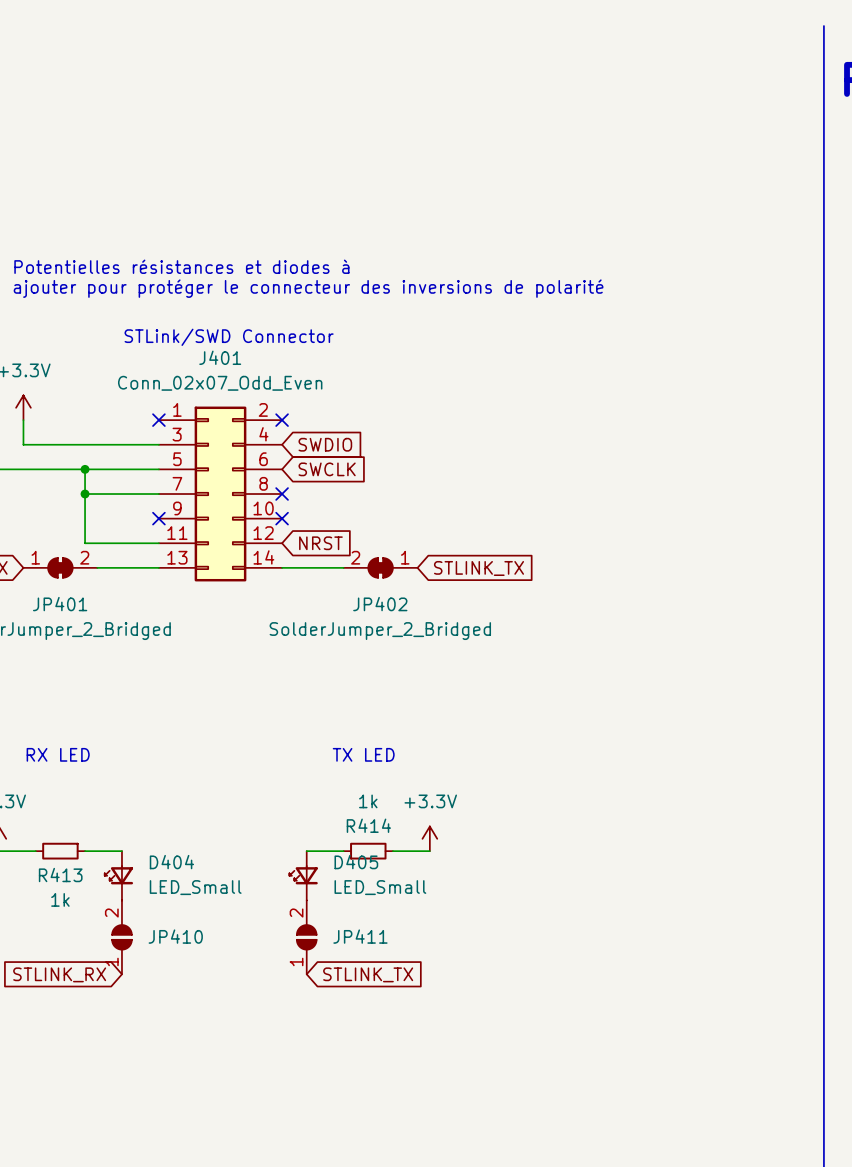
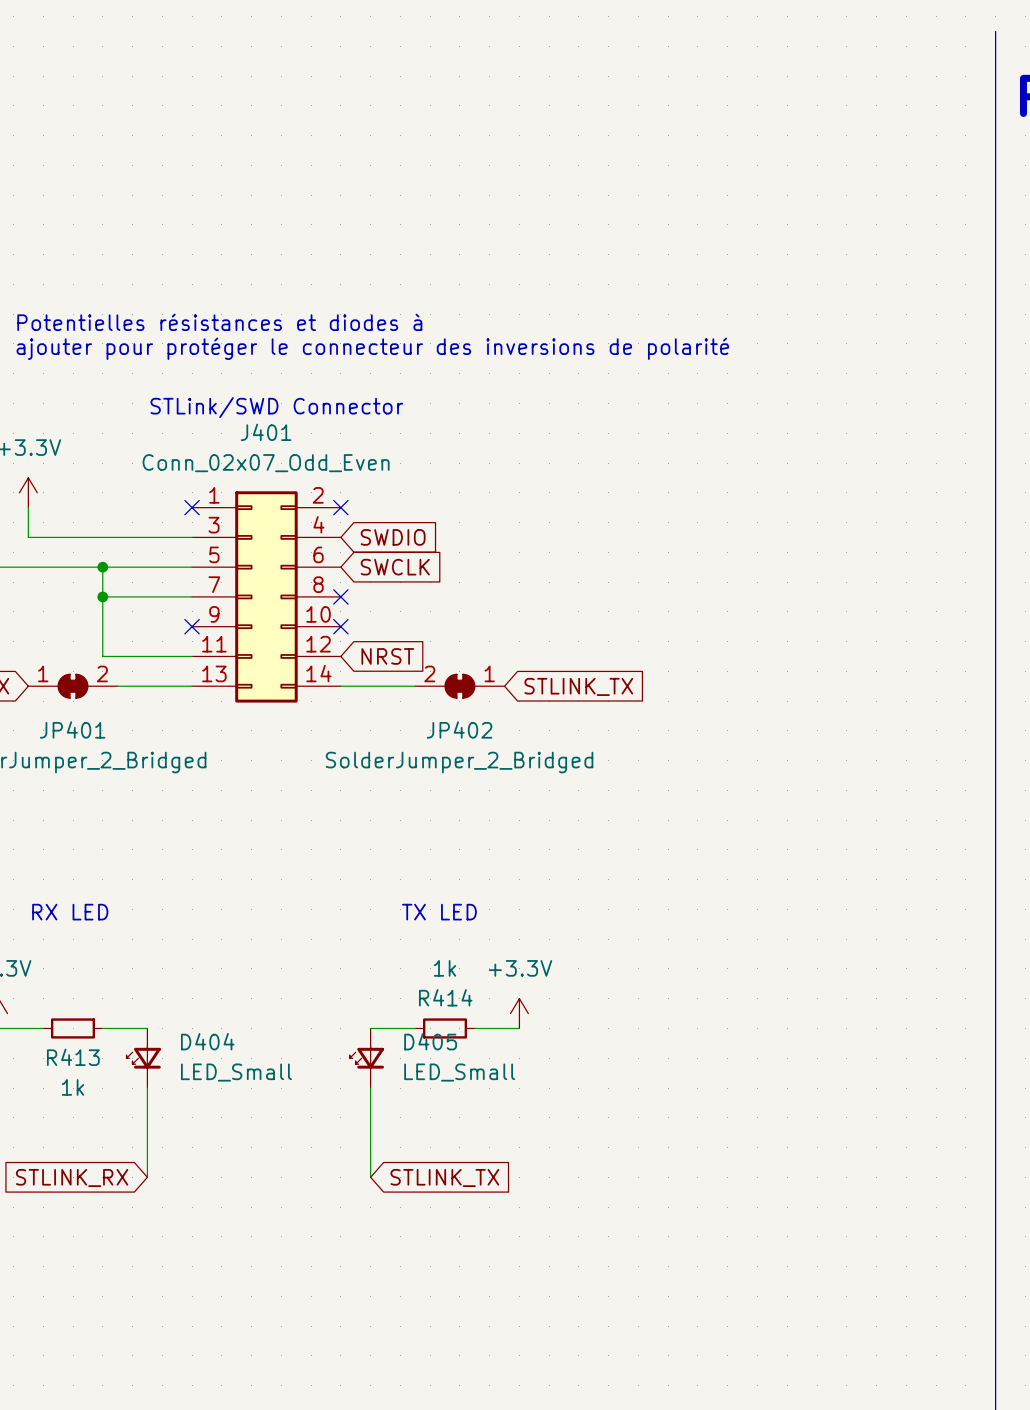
JP410: (121, 937) -> none
JP411: (306, 937) -> none

